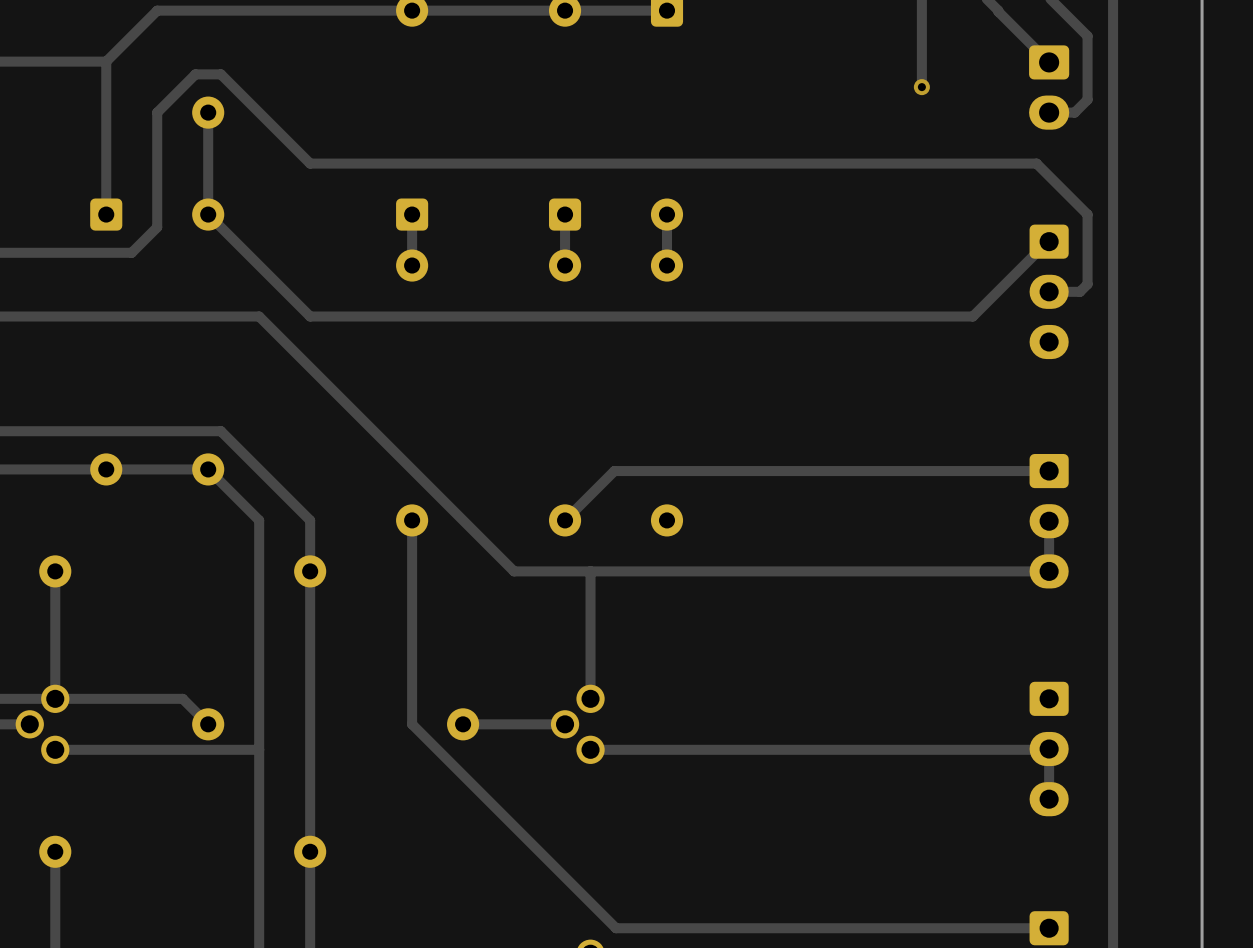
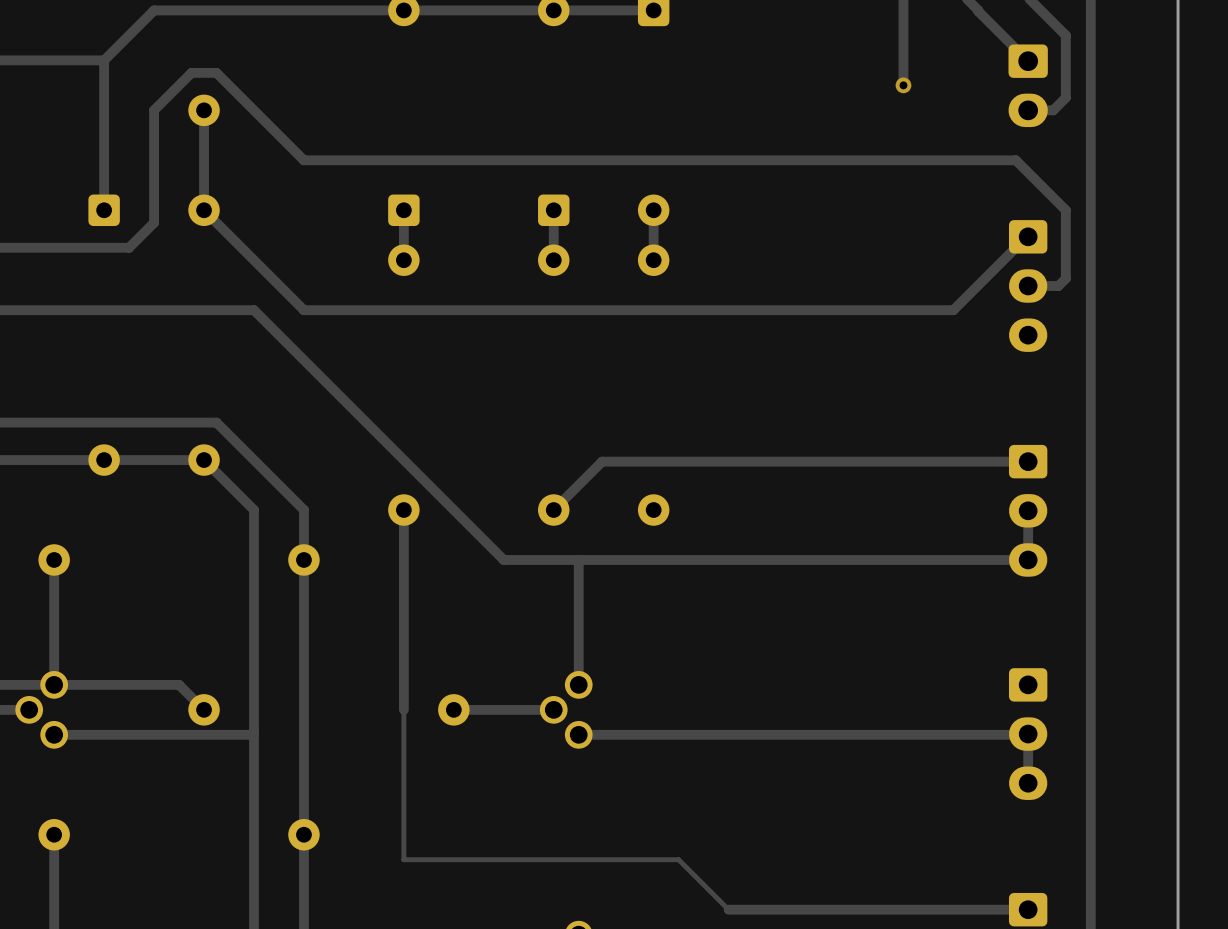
track: (412, 724) (616, 928) (743, 928) -> (403, 709) (403, 859) (678, 859) (728, 909)

